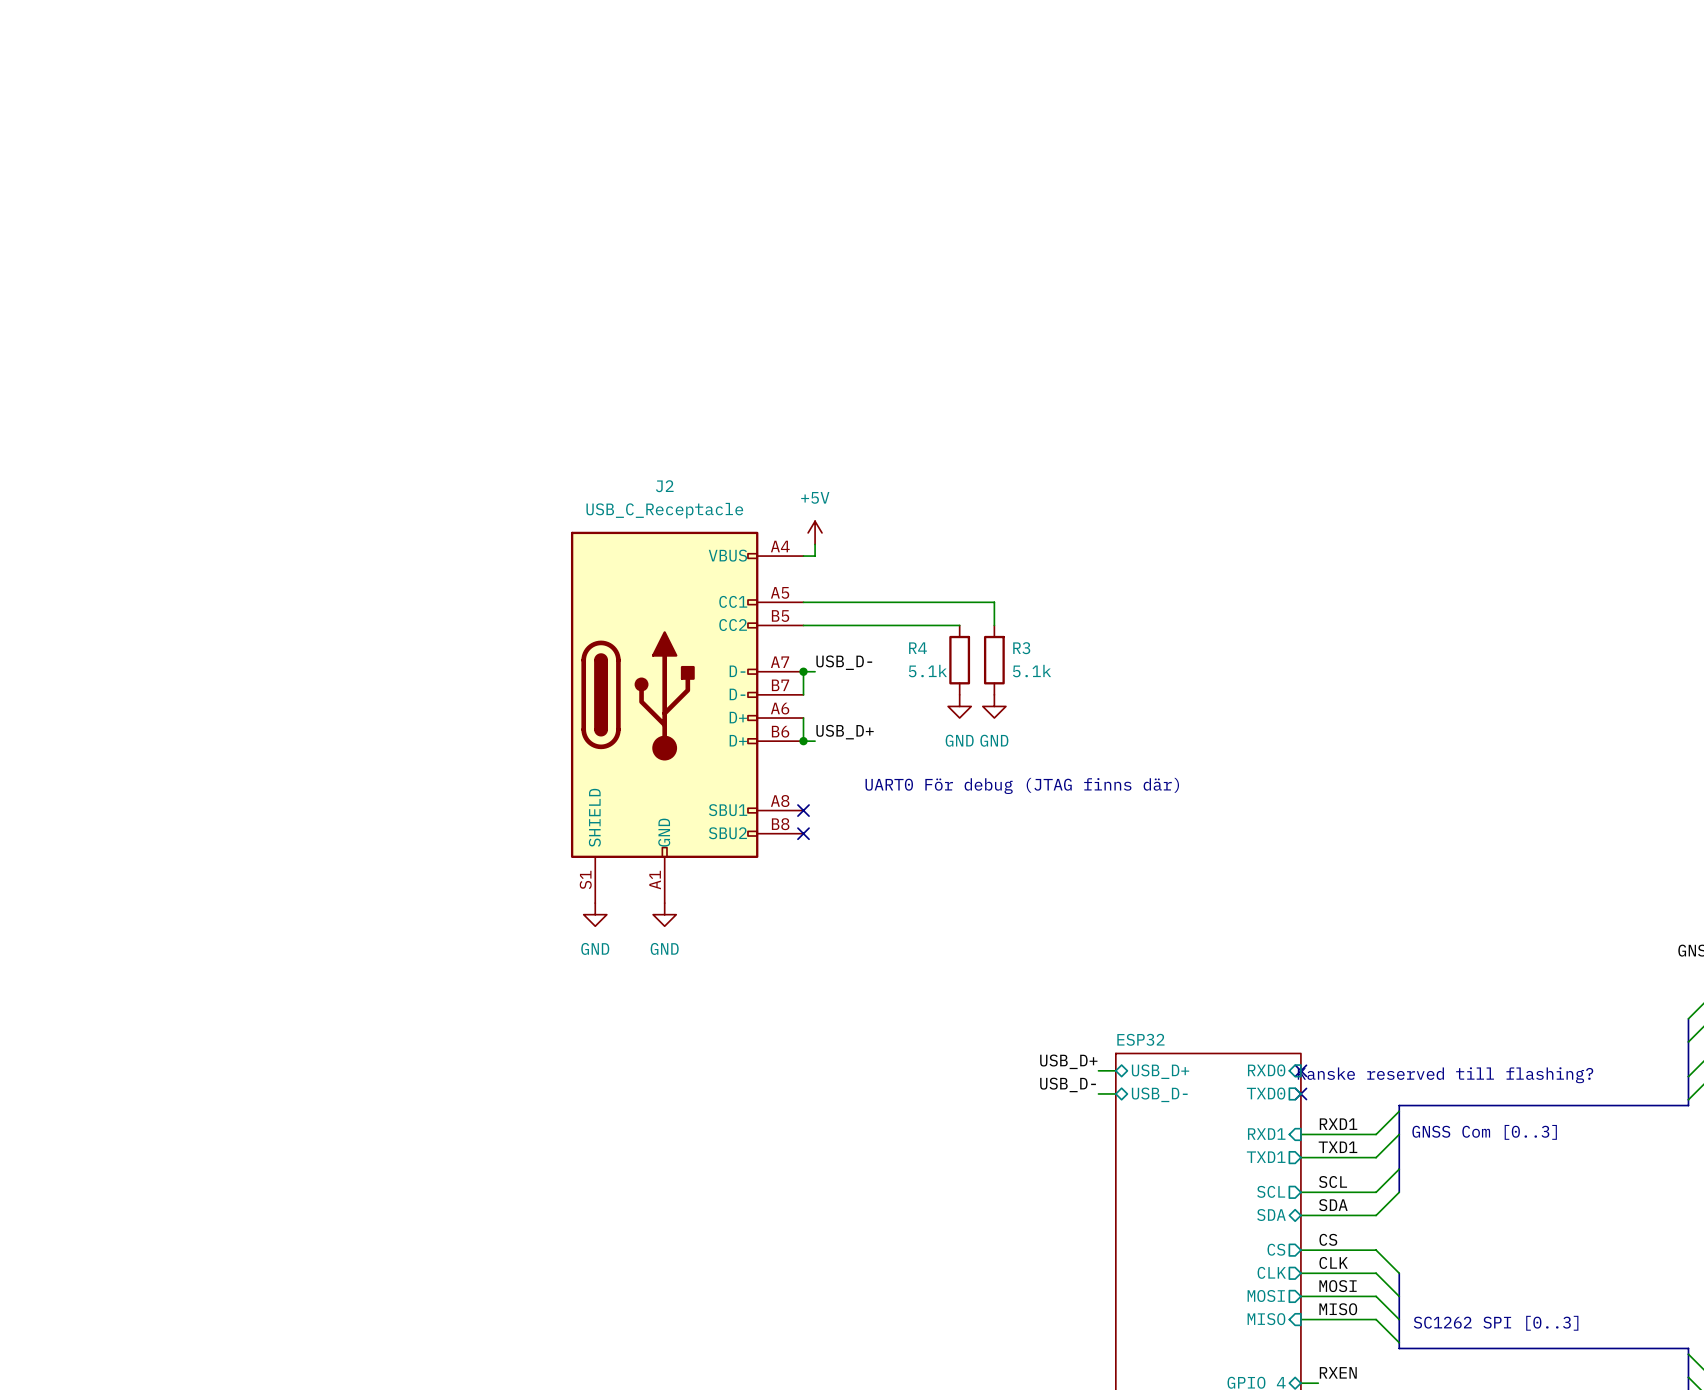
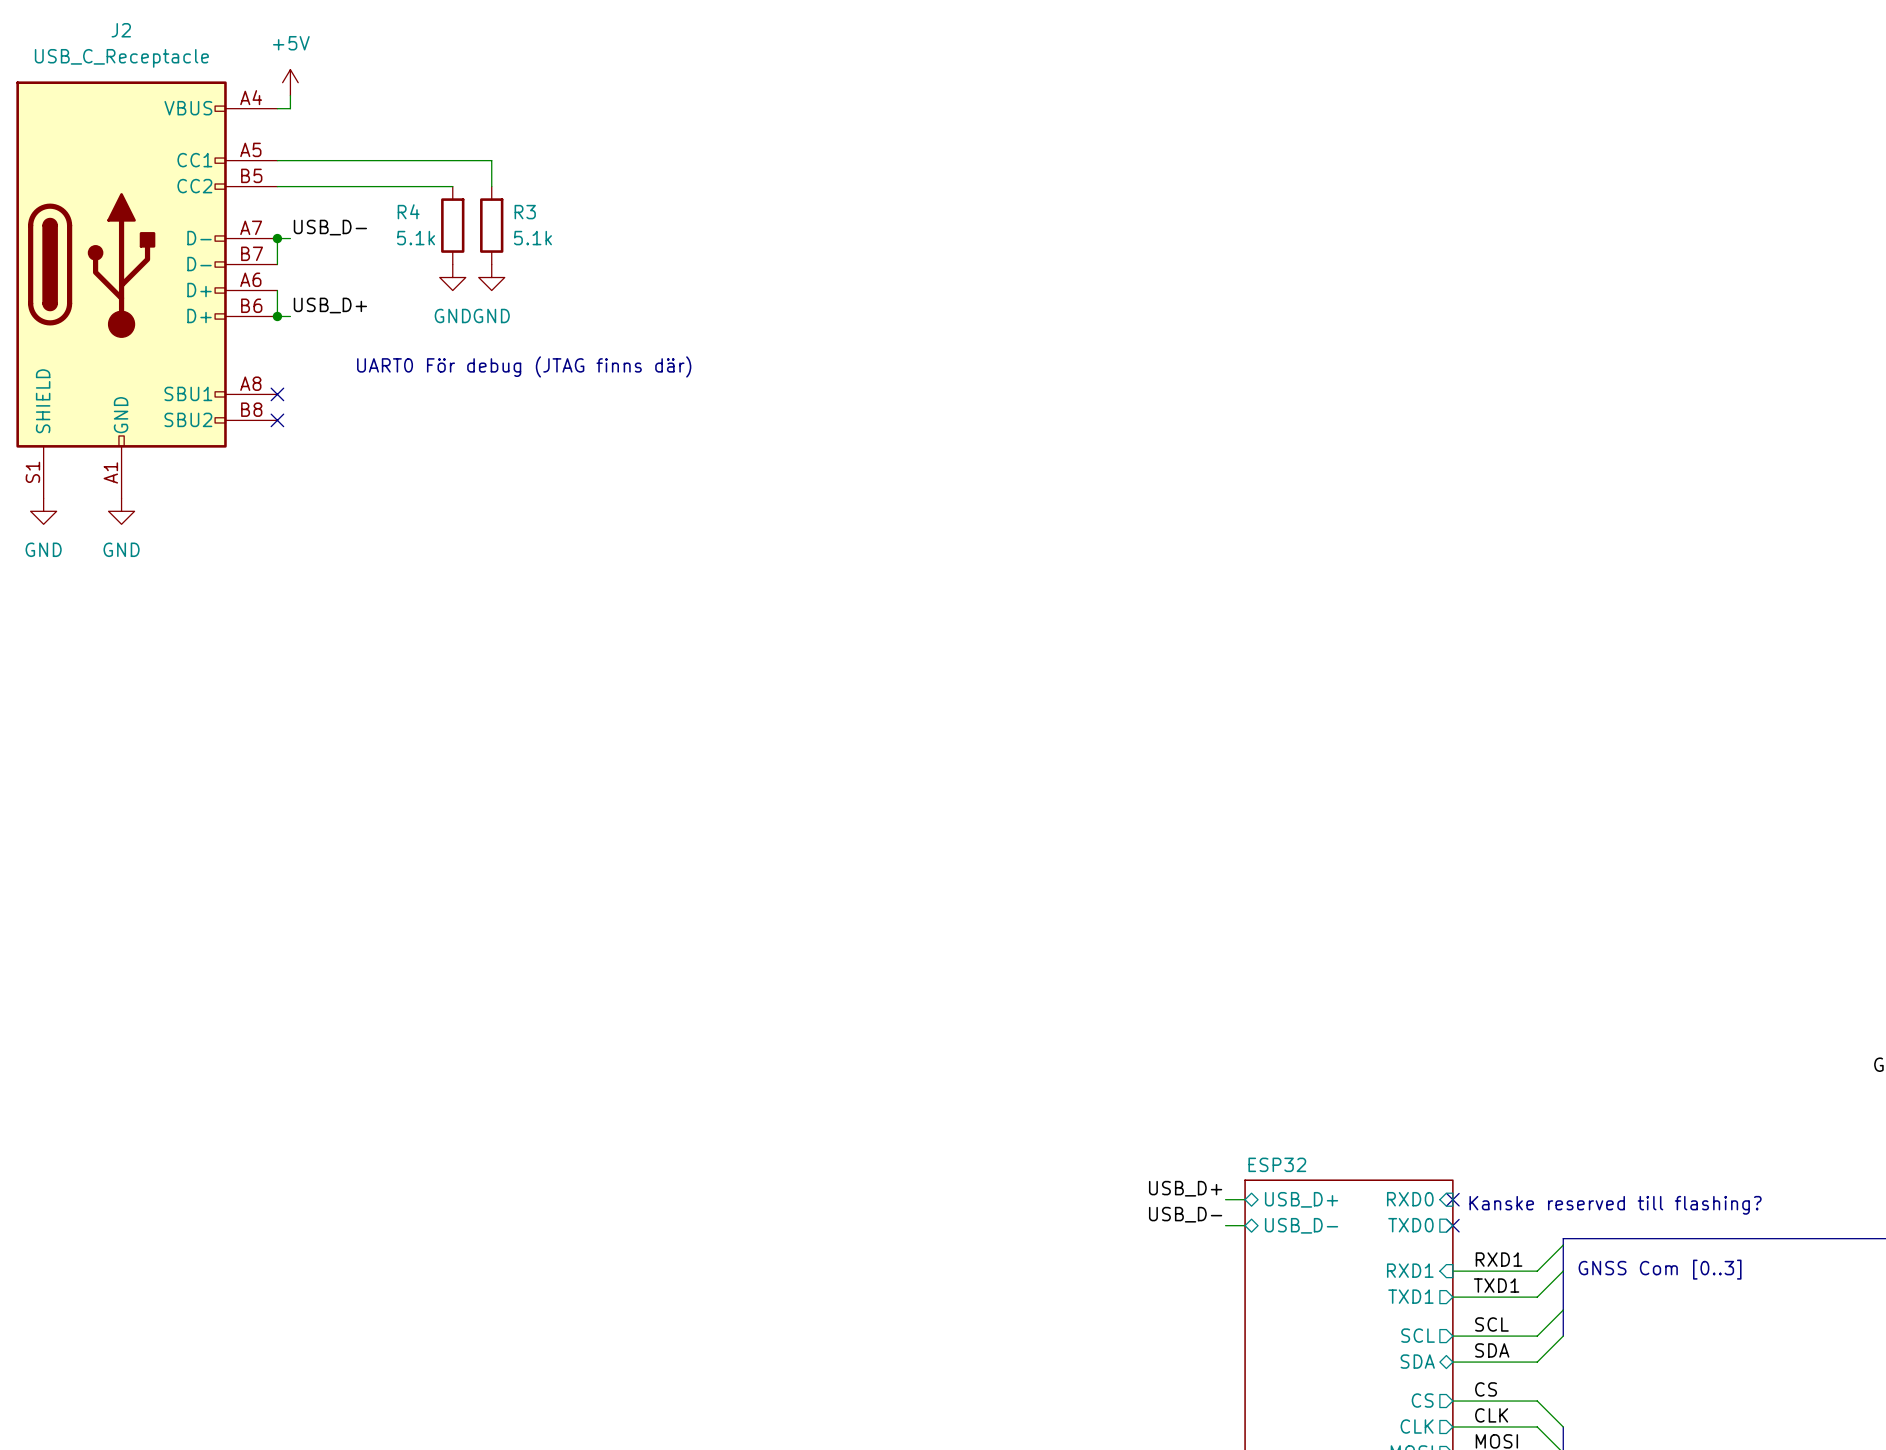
power symbol: none -> +5V (290, 82)
wire: none -> (290, 95) (290, 108) (277, 108)
wire: none -> (277, 160) (491, 160) (491, 186)
wire: none -> (277, 186) (452, 186)
label: none -> USB_D- (330, 227)
junction: none -> (277, 238)
wire: none -> (290, 238) (277, 238) (277, 264)
power symbol: none -> GND (452, 277)
power symbol: none -> GND (491, 277)
wire: none -> (277, 290) (277, 316) (290, 316)
label: none -> USB_D+ (330, 305)
junction: none -> (277, 316)
text: none -> UART0 För debug (JTAG finns där) (524, 366)
no-connect mark: none -> (277, 394)
no-connect mark: none -> (277, 420)
power symbol: none -> GND (43, 511)
power symbol: none -> GND (121, 511)
power symbol: +5V (815, 532) -> none
wire: (815, 544) (815, 556) (803, 556) -> none
wire: (803, 602) (994, 602) (994, 625) -> none
wire: (803, 625) (959, 625) -> none
R4 position: (959, 660) -> (452, 225)
R3 position: (994, 660) -> (491, 225)
label: USB_D- (844, 662) -> none
junction: (803, 671) -> none
wire: (815, 671) (803, 671) (803, 694) -> none
power symbol: GND (959, 706) -> none
power symbol: GND (994, 706) -> none
J2 position: (687, 717) -> (146, 289)
wire: (803, 718) (803, 741) (815, 741) -> none
label: USB_D+ (845, 732) -> none
junction: (803, 741) -> none
text: UART0 För debug (JTAG finns där) (1022, 785) -> none
no-connect mark: (803, 810) -> none
no-connect mark: (803, 833) -> none
power symbol: GND (595, 914) -> none
power symbol: GND (664, 914) -> none

